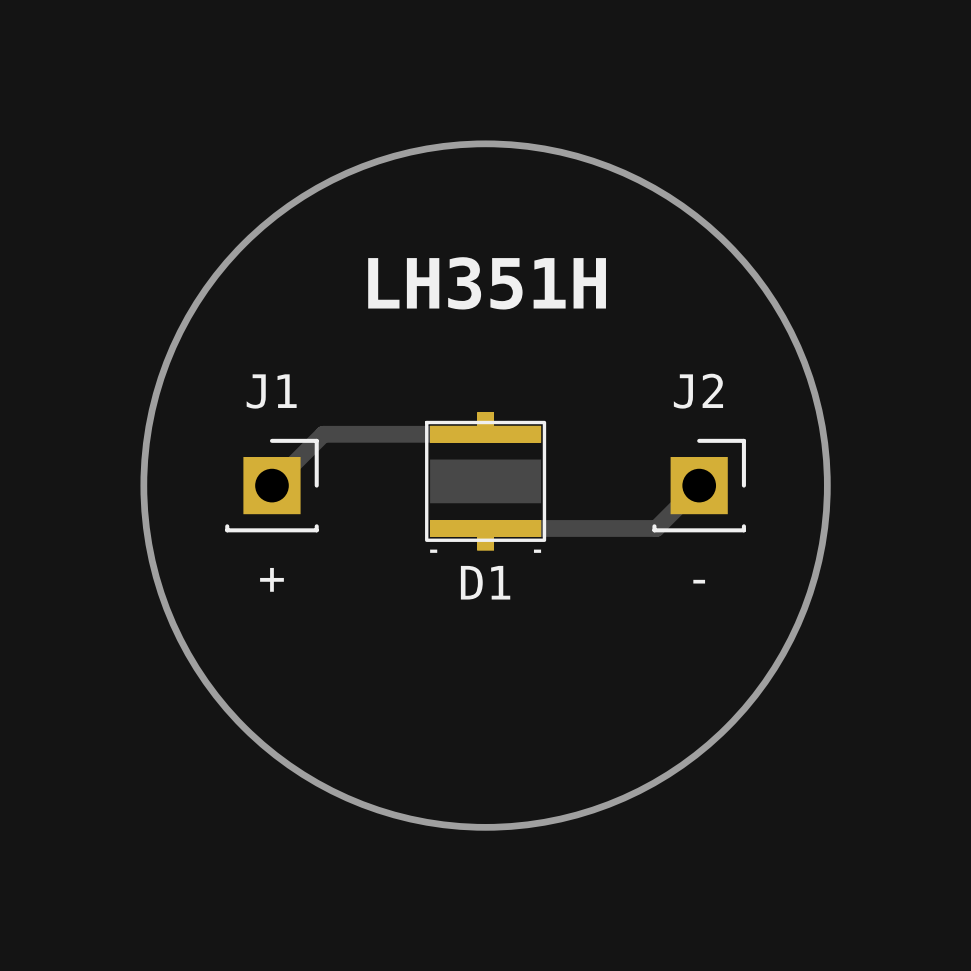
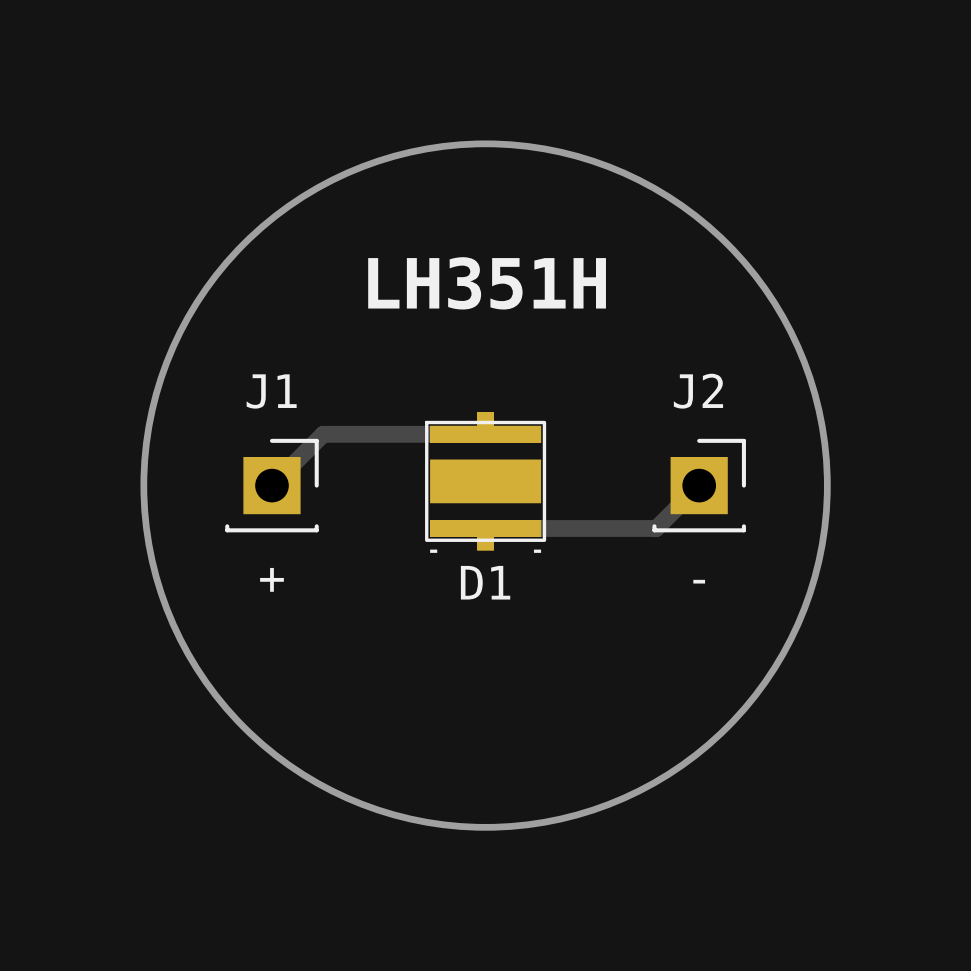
D1 footprint: [425, 412, 547, 551] -> [425, 412, 547, 551]

